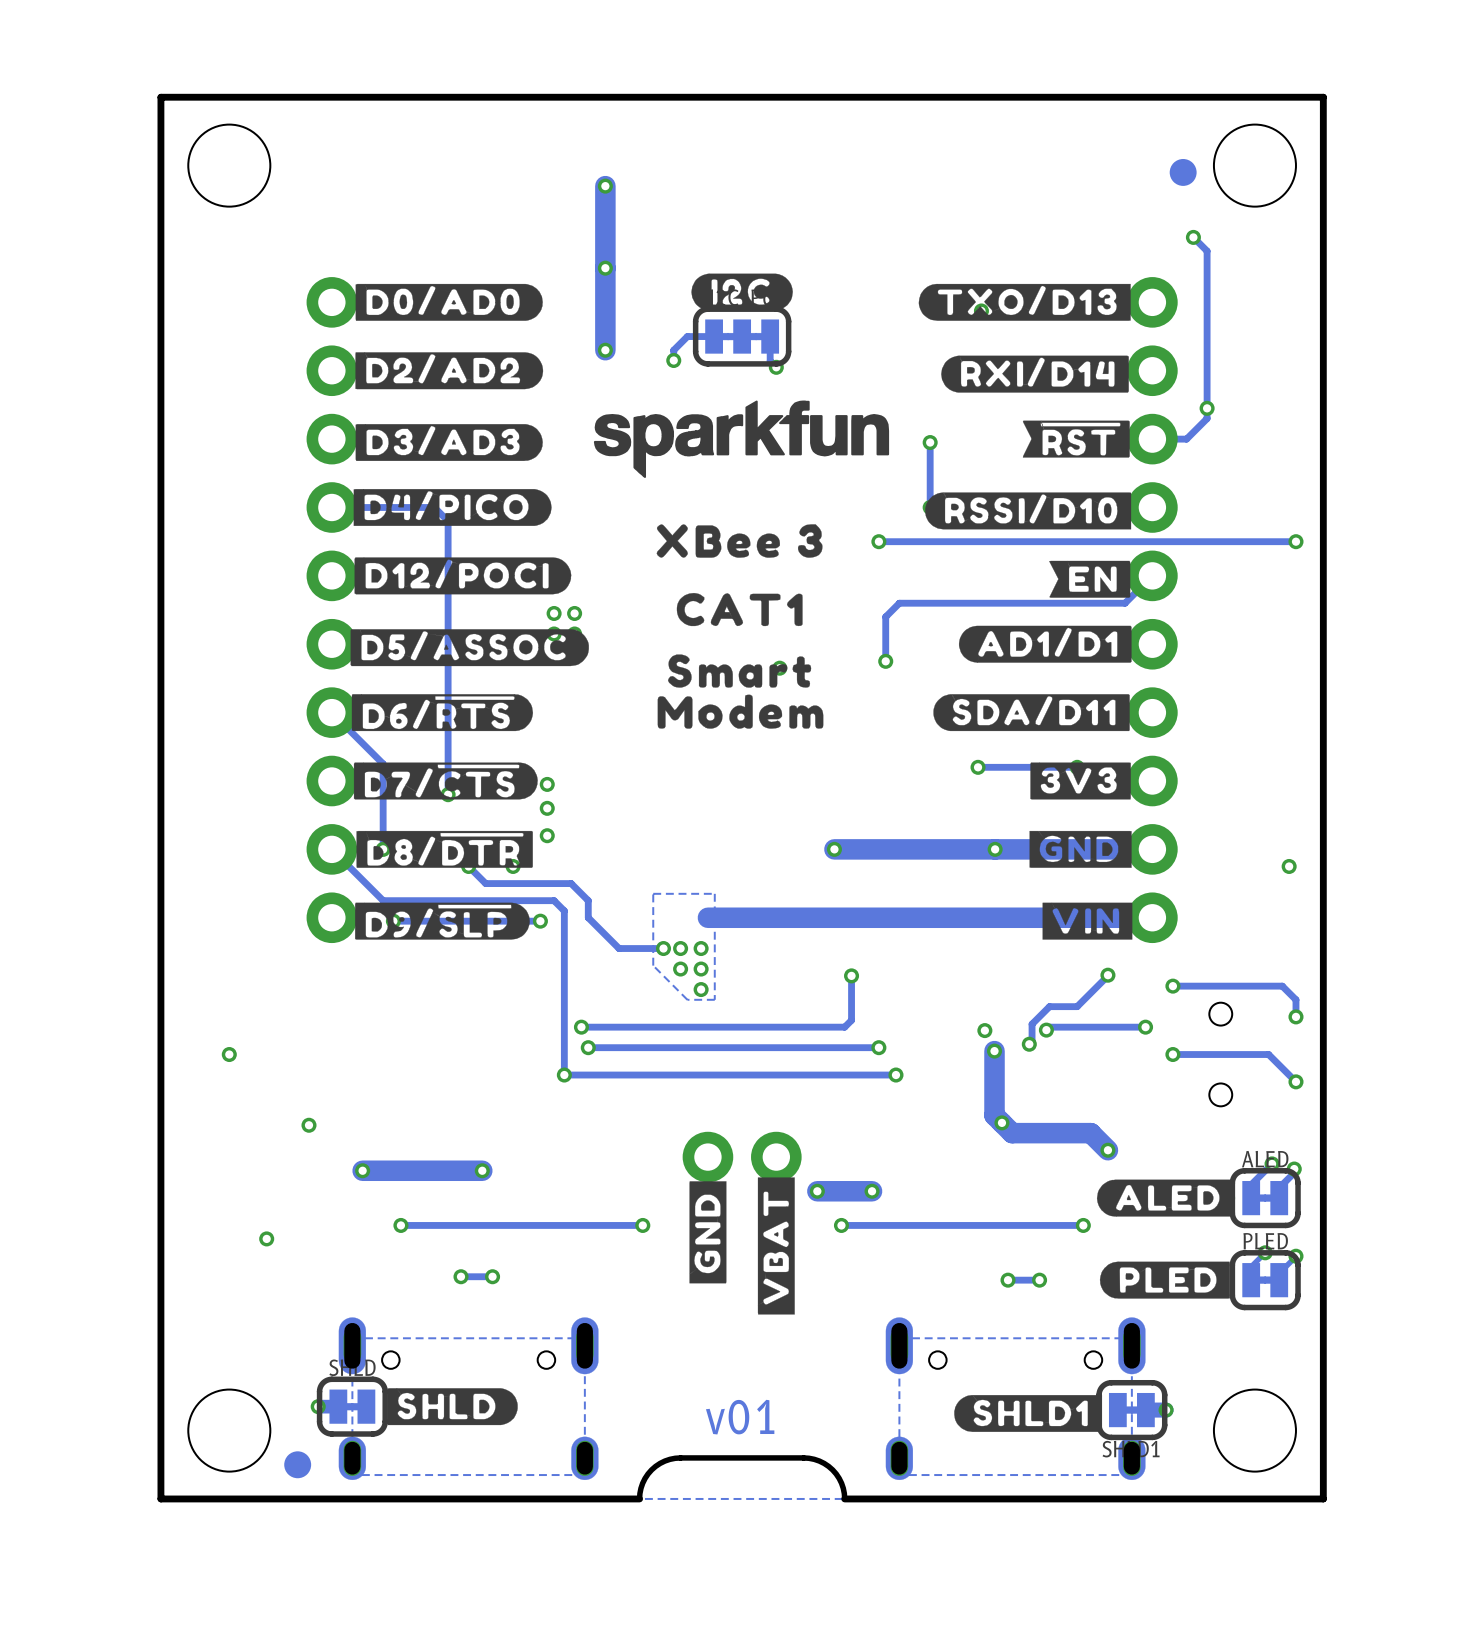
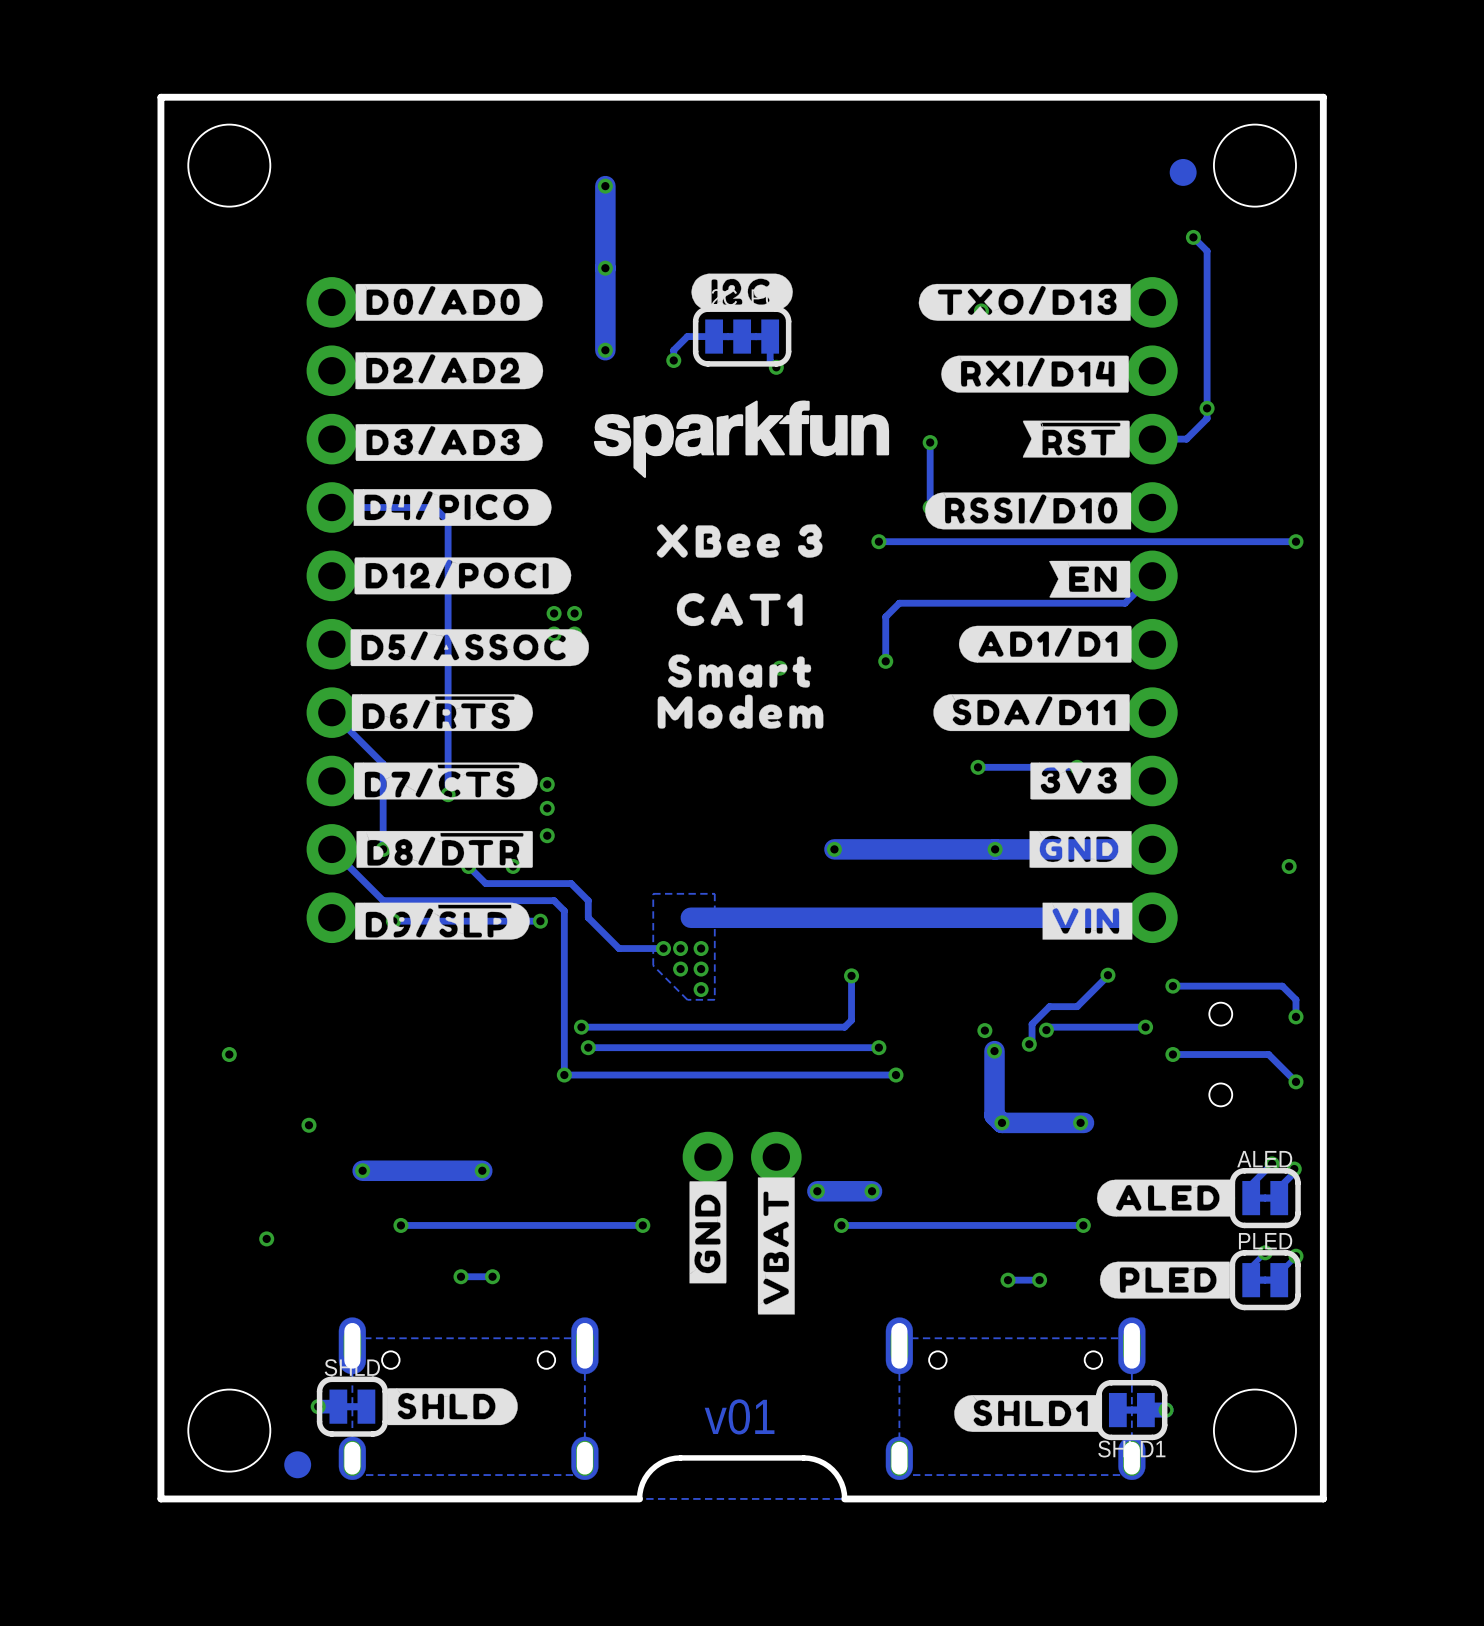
track: none -> (707, 917) (690, 917)
track: (1001, 1122) (1012, 1133) (1090, 1133) (1107, 1150) -> (1001, 1122) (1084, 1122)
via position: (1107, 1150) -> (1080, 1122)

